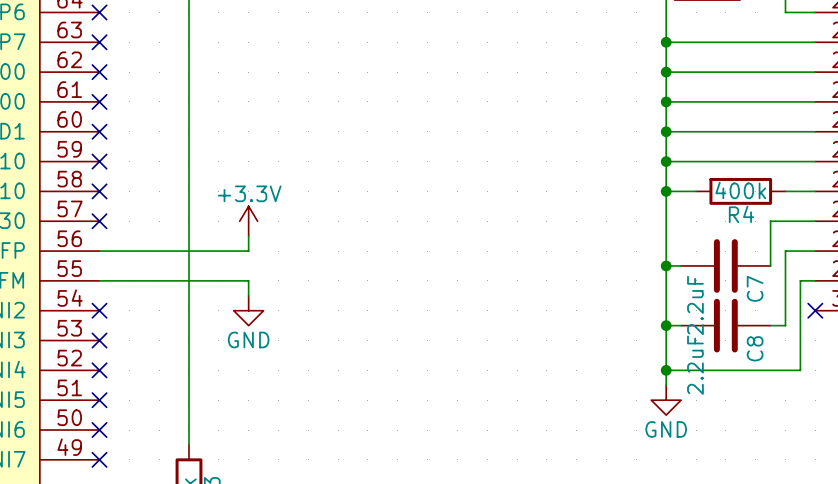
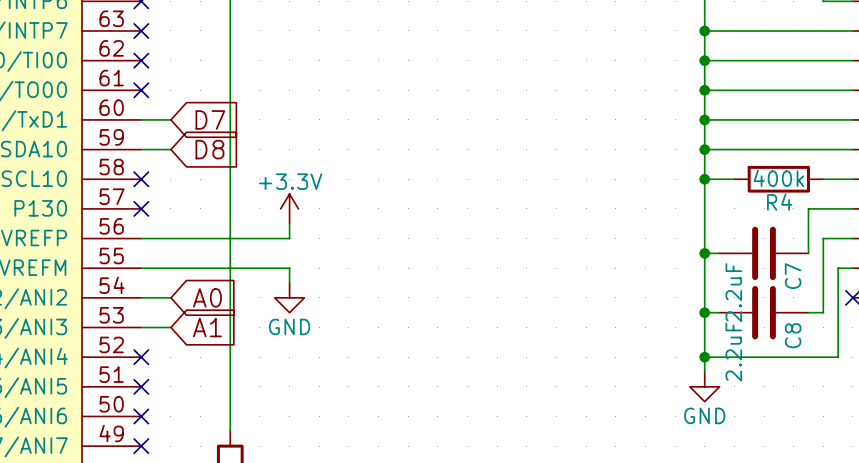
wire: none -> (141, 119) (170, 119)
no-connect mark: (99, 131) -> none
global label: none -> D7 (210, 119)
wire: none -> (141, 149) (170, 149)
no-connect mark: (99, 161) -> none
global label: none -> D8 (209, 149)
wire: none -> (141, 297) (170, 297)
no-connect mark: (99, 310) -> none
global label: none -> A0 (207, 297)
wire: none -> (141, 327) (170, 327)
no-connect mark: (99, 340) -> none
global label: none -> A1 (207, 327)

